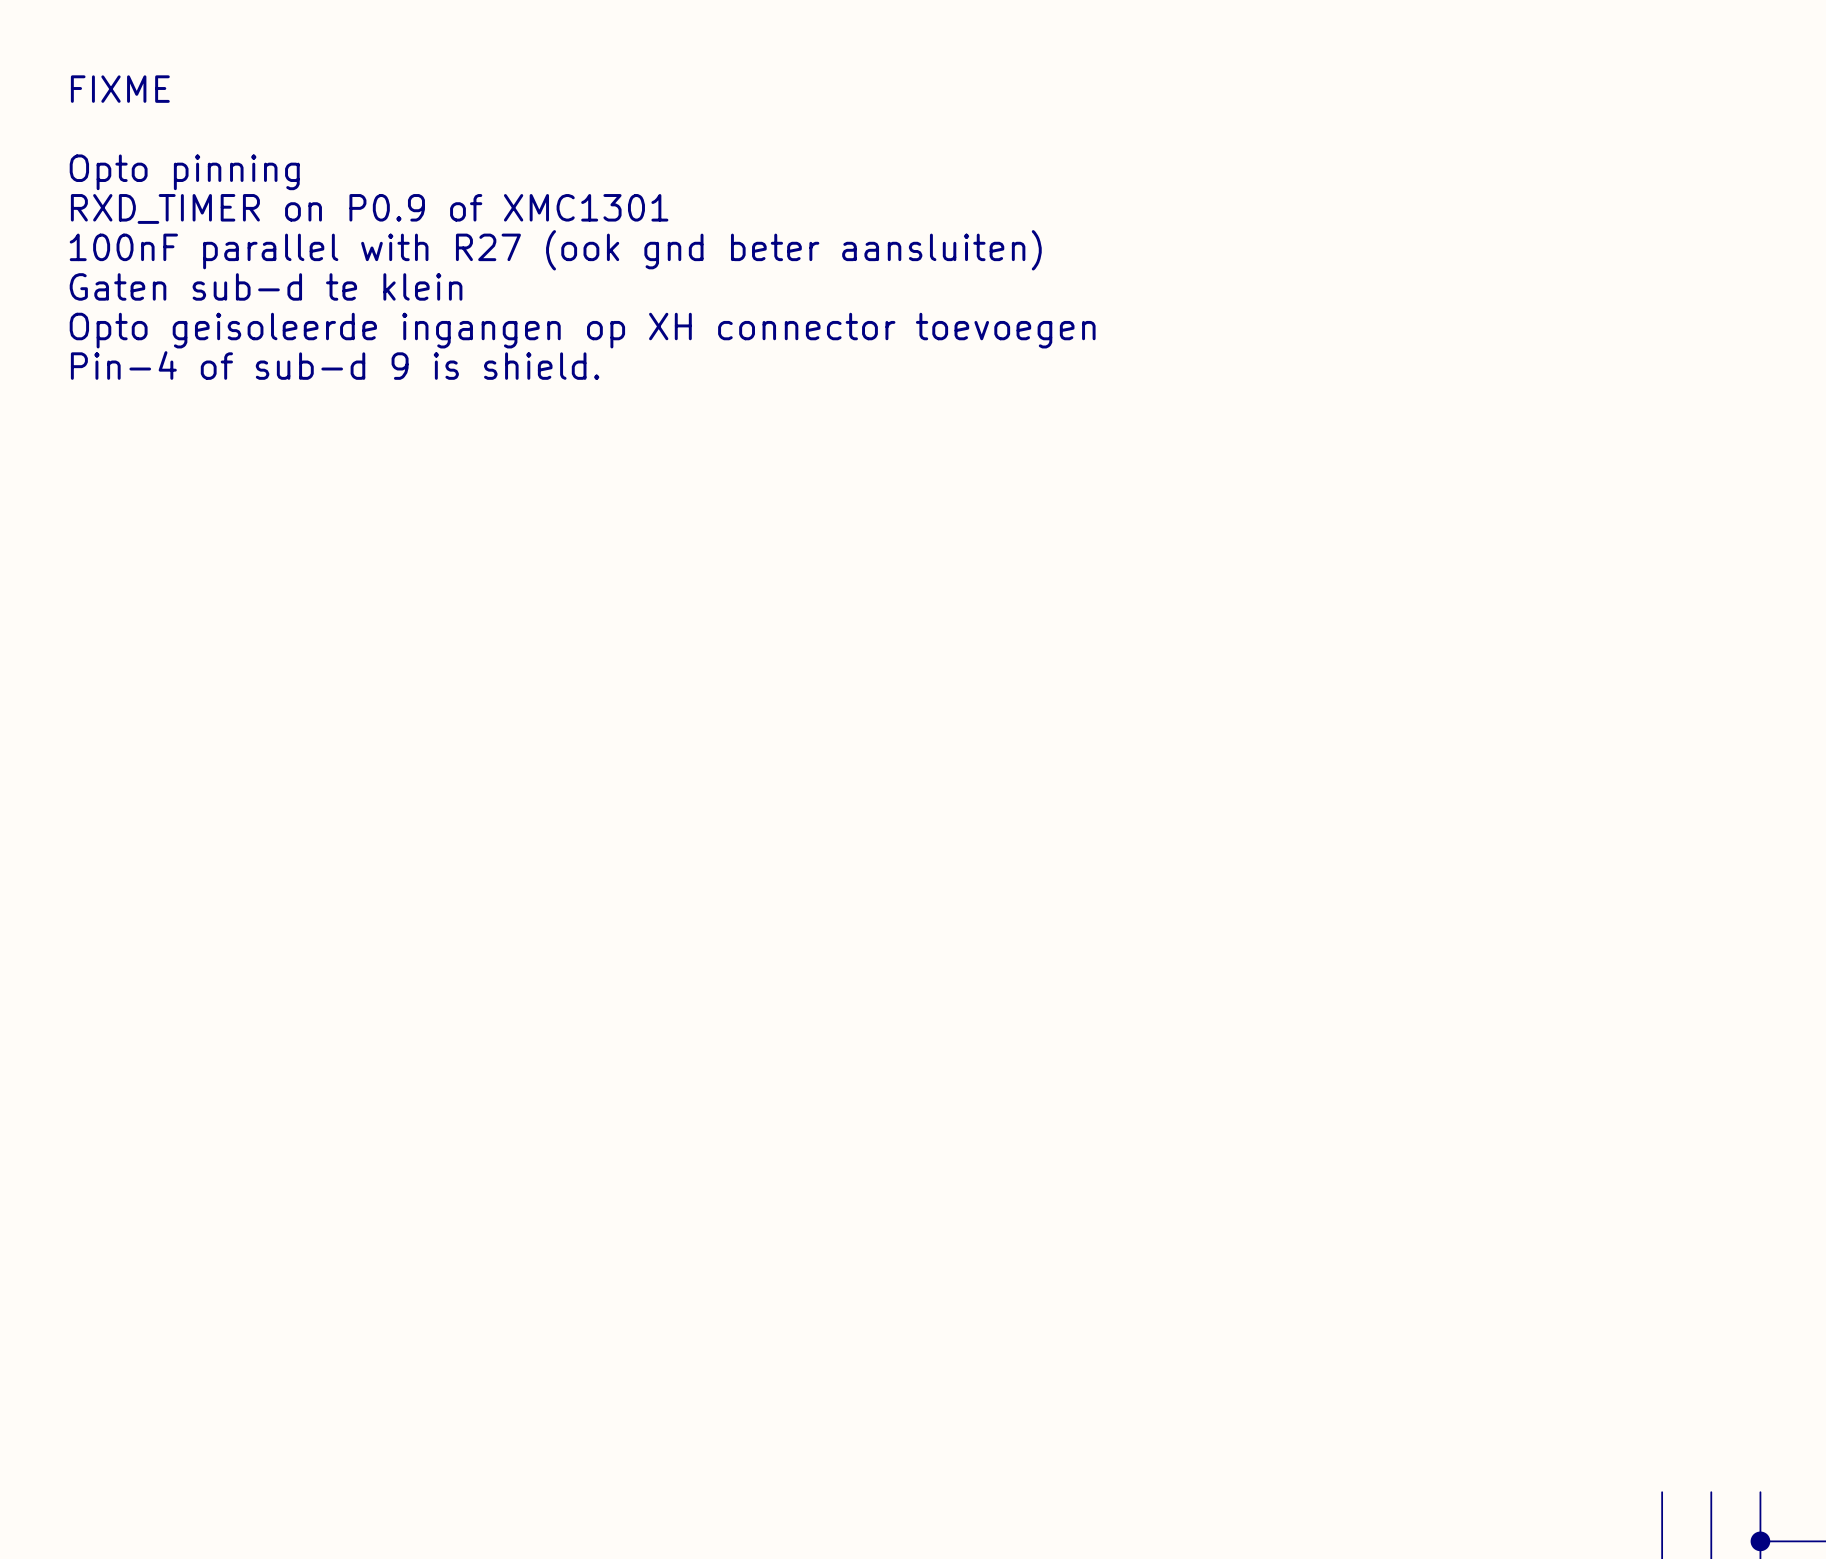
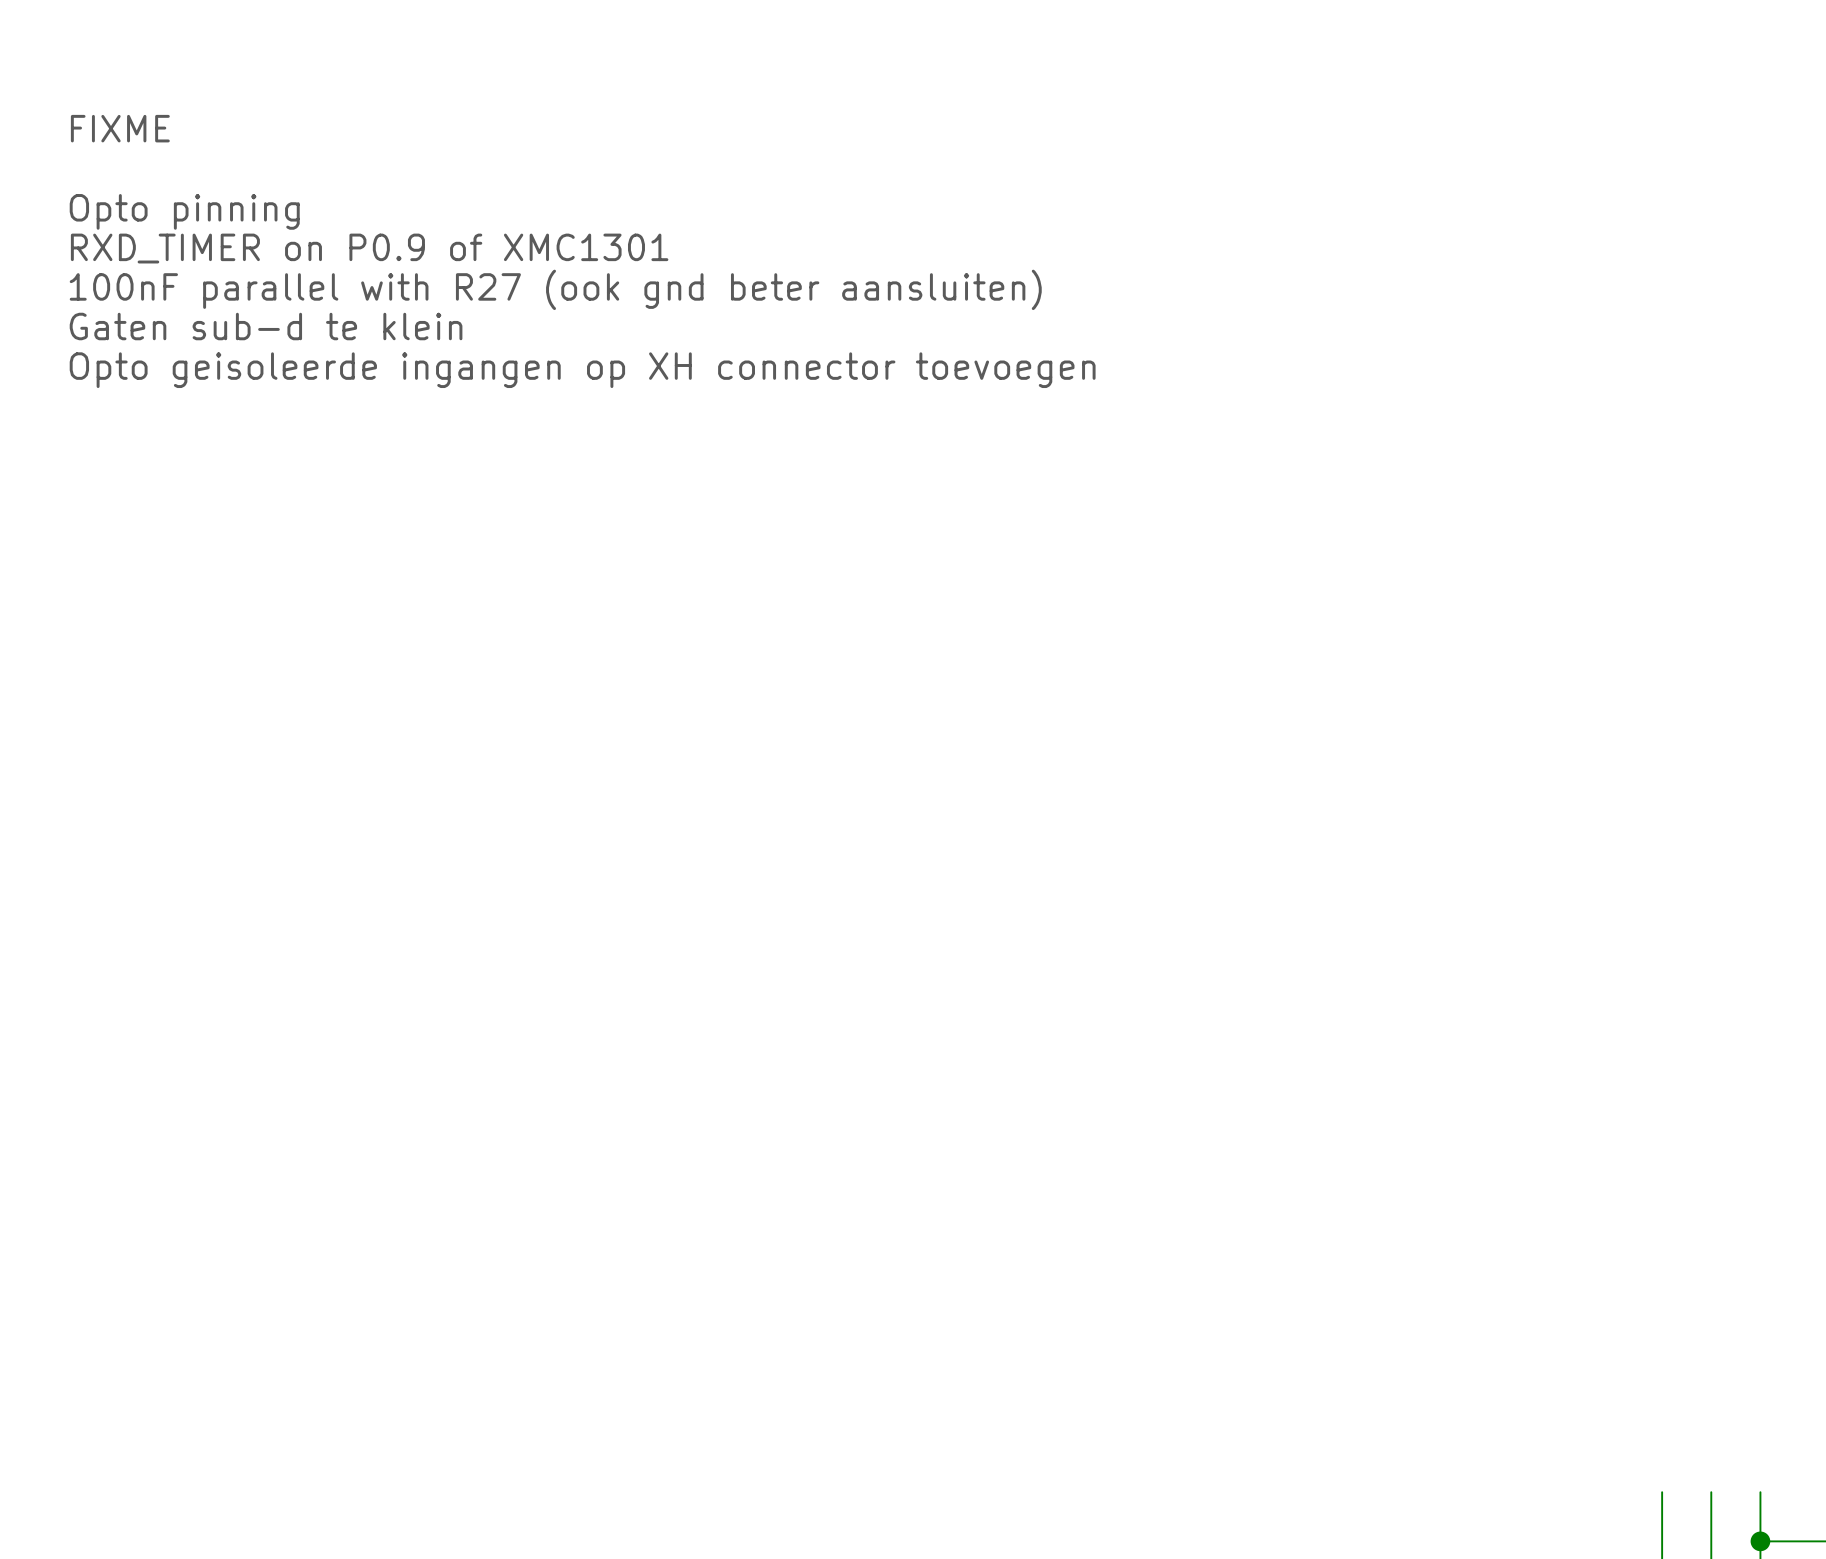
text position: FIXME (120, 89) -> FIXME (120, 128)
text: Opto pinning (184, 172) -> none
text: RXD_TIMER on P0.9 of XMC1301 (369, 208) -> Opto pinning (184, 211)
text: 100nF parallel with R27 (ook gnd beter aansluiten) (555, 250) -> RXD_TIMER on P0.9 of XMC1301 (369, 248)
text: Gaten sub-d te klein (266, 286) -> 100nF parallel with R27 (ook gnd beter aansluiten) (555, 289)
text: Opto geisoleerde ingangen op XH connector toevoegen (582, 330) -> Gaten sub-d te klein (266, 326)
text: Pin-4 of sub-d 9 is shield. (335, 365) -> Opto geisoleerde ingangen op XH connector toevoegen (582, 370)

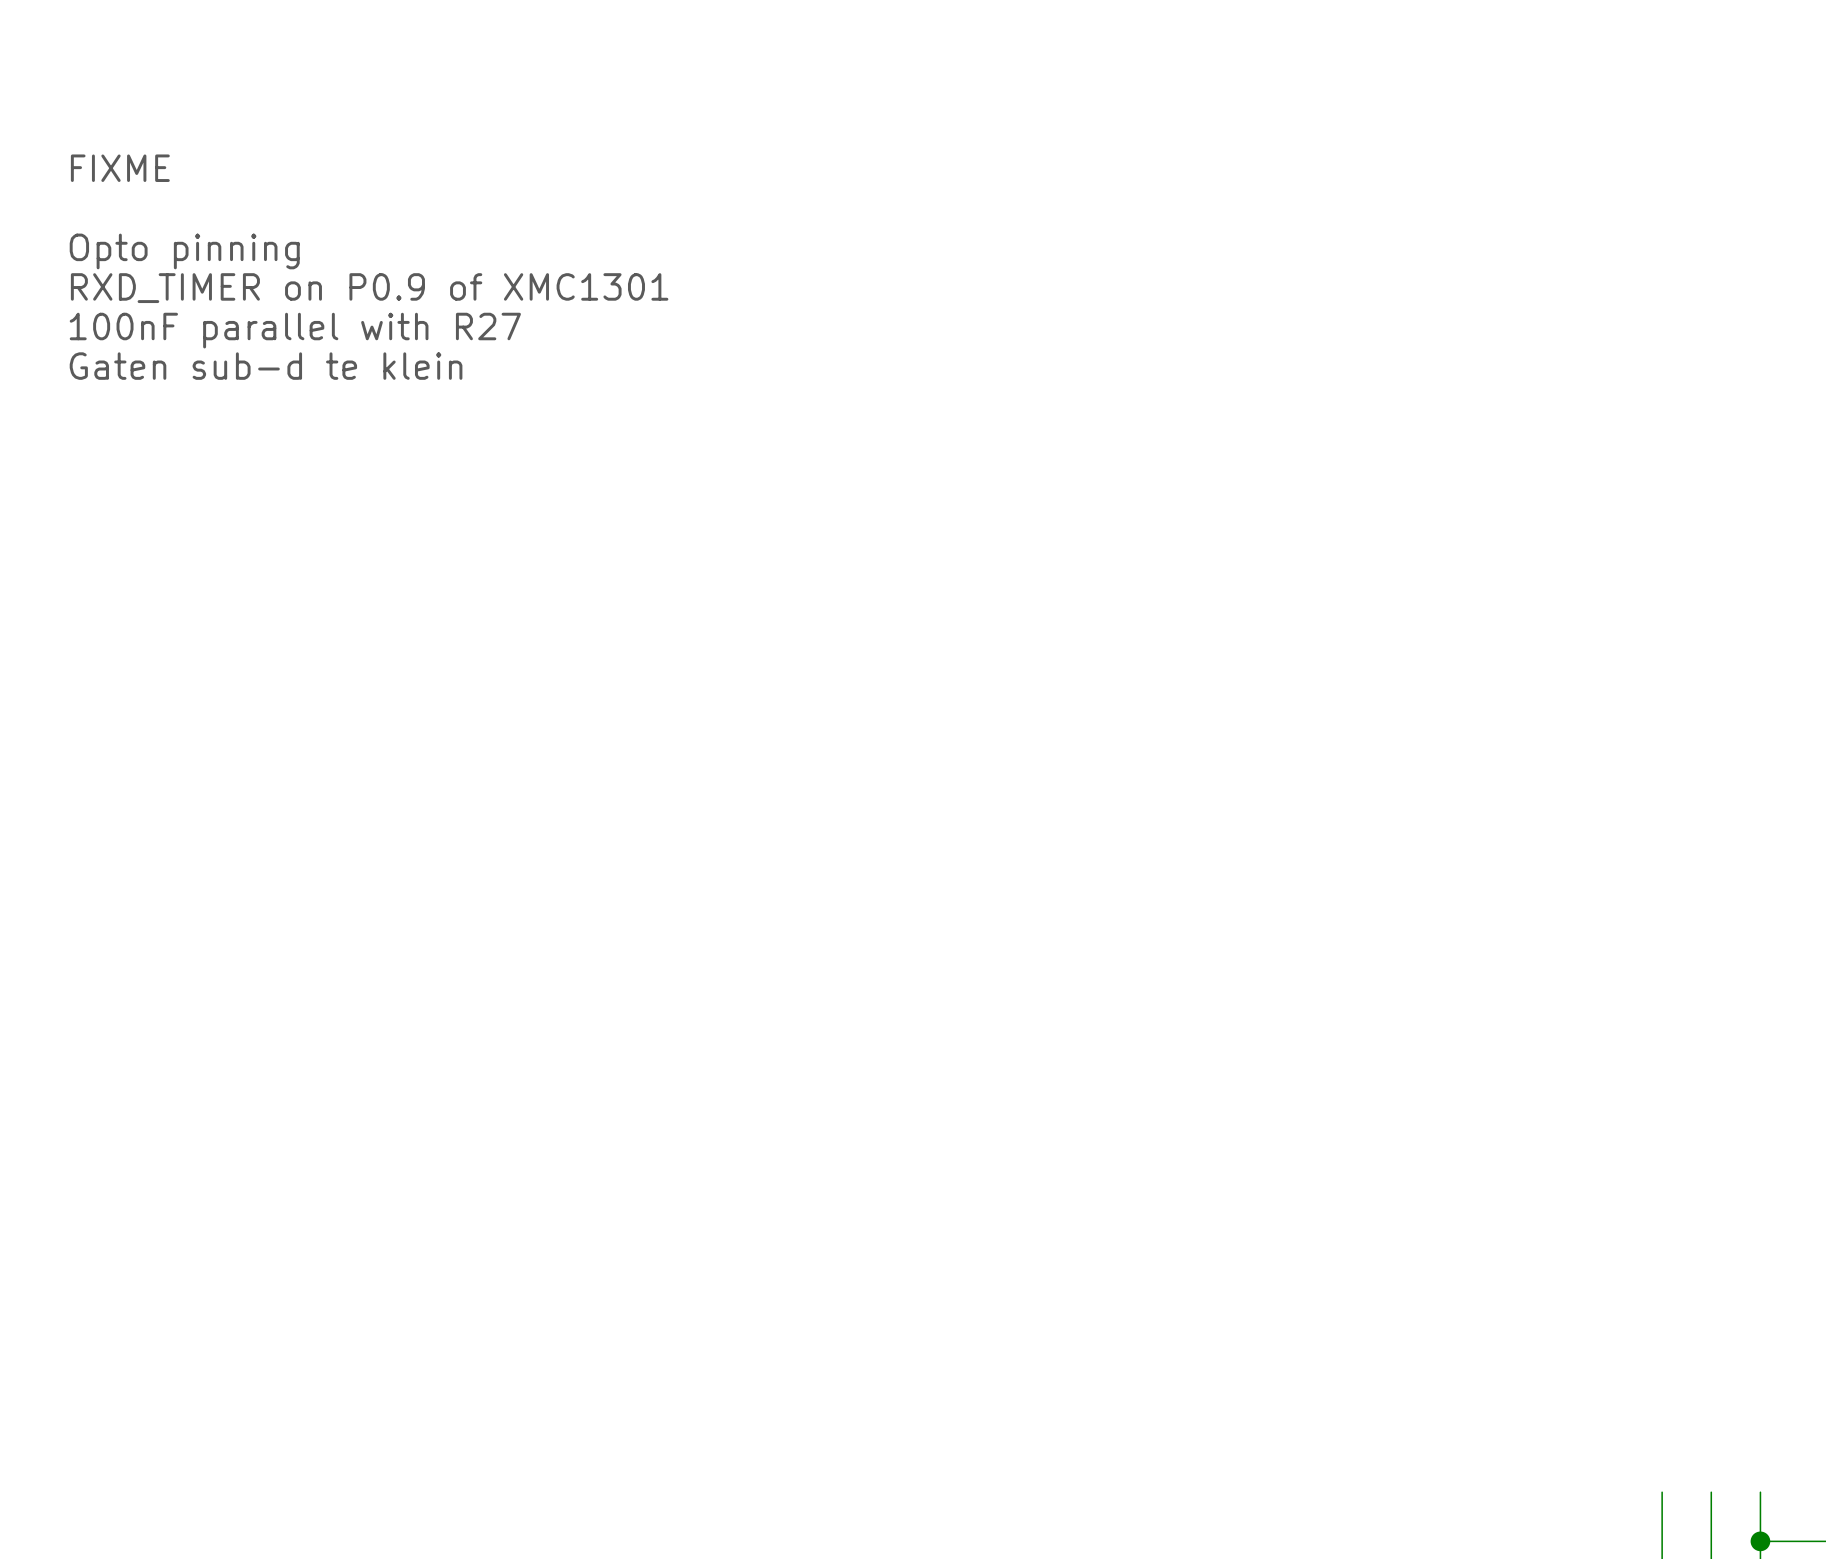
text position: FIXME (120, 128) -> FIXME (120, 168)
text: Opto pinning (184, 211) -> none
text: RXD_TIMER on P0.9 of XMC1301 (369, 248) -> Opto pinning (184, 251)
text: 100nF parallel with R27 (ook gnd beter aansluiten) (555, 289) -> RXD_TIMER on P0.9 of XMC1301 (369, 288)
text: Gaten sub-d te klein (266, 326) -> 100nF parallel with R27 (295, 330)
text: Opto geisoleerde ingangen op XH connector toevoegen (582, 370) -> Gaten sub-d te klein (266, 366)

